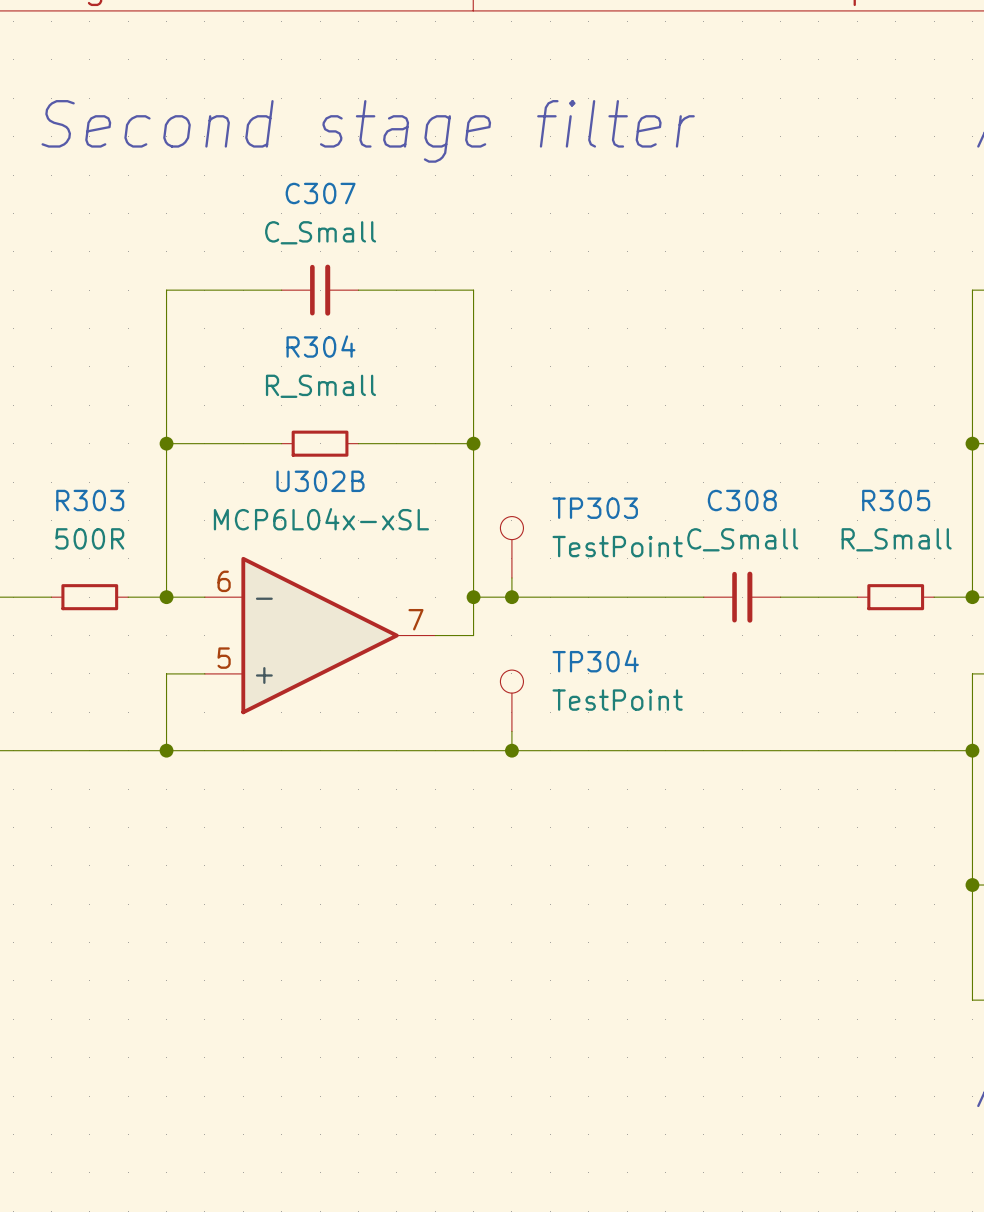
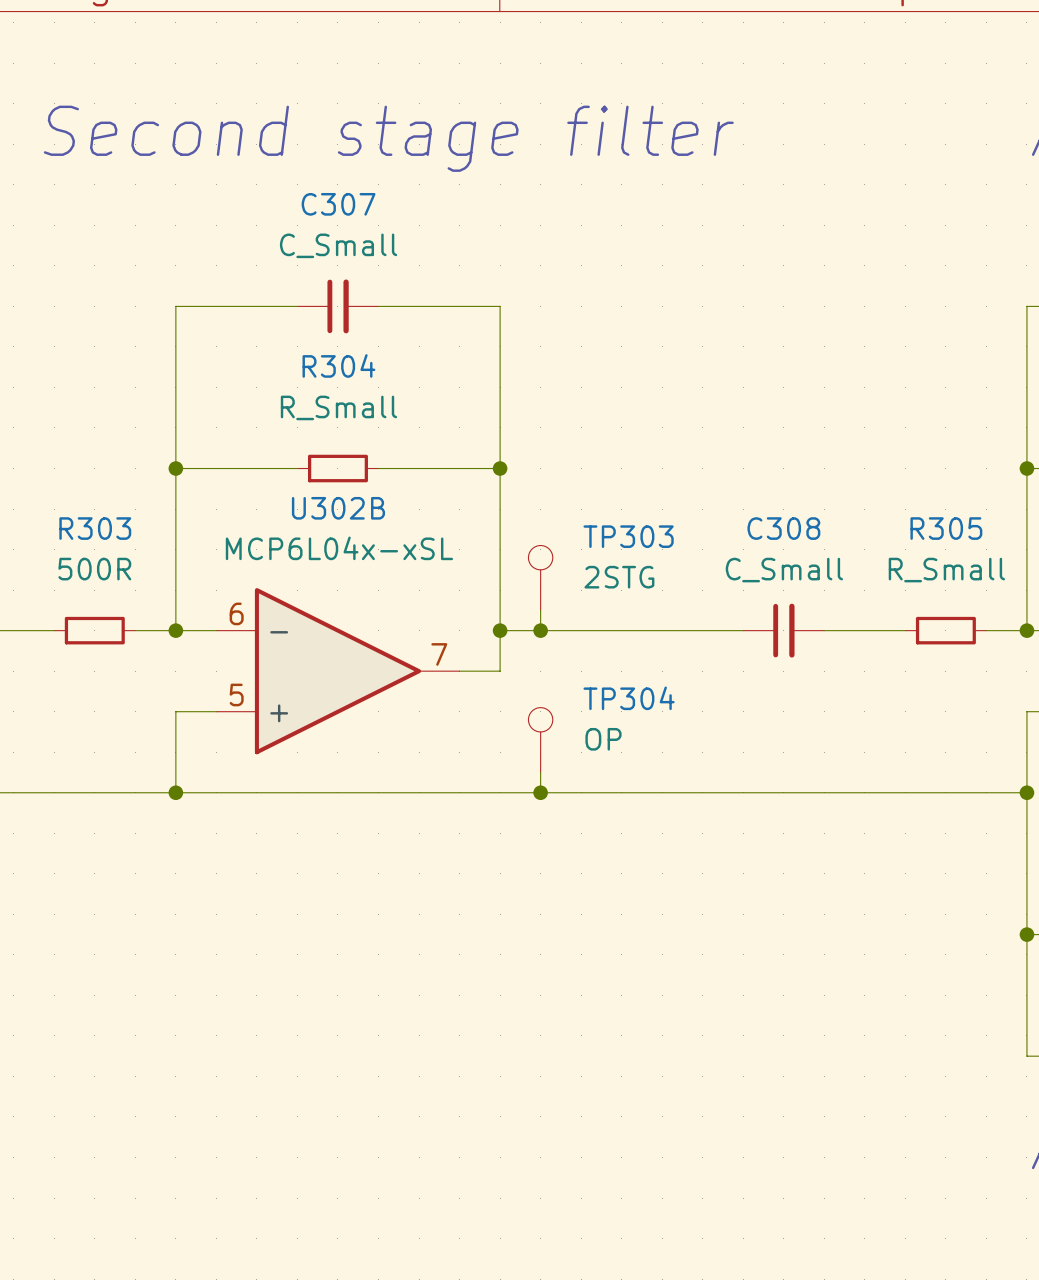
TP303 value: TestPoint (617, 546) -> 2STG (619, 577)
TP304 value: TestPoint (617, 700) -> OP (603, 739)

